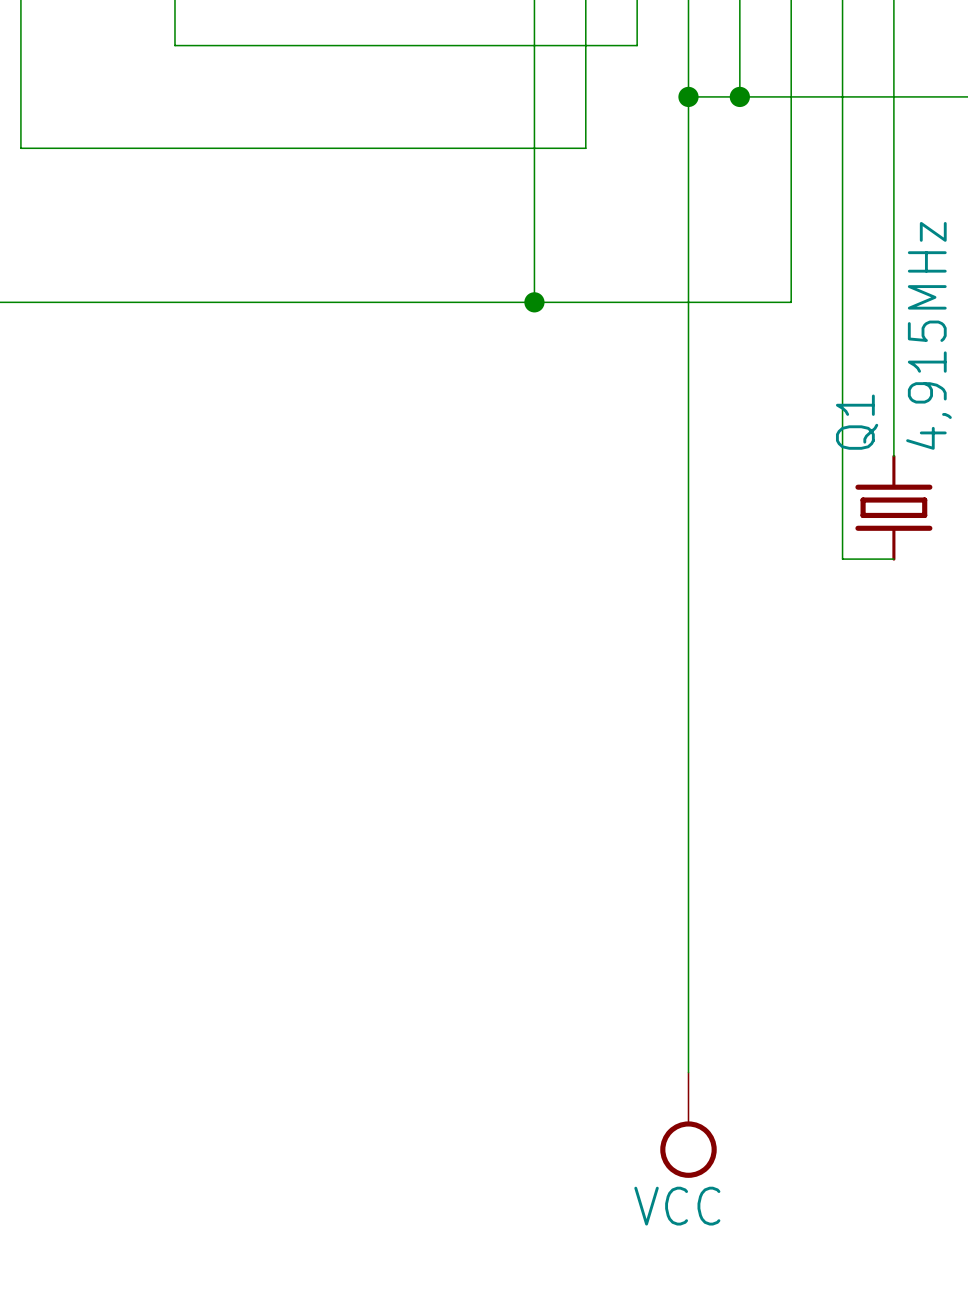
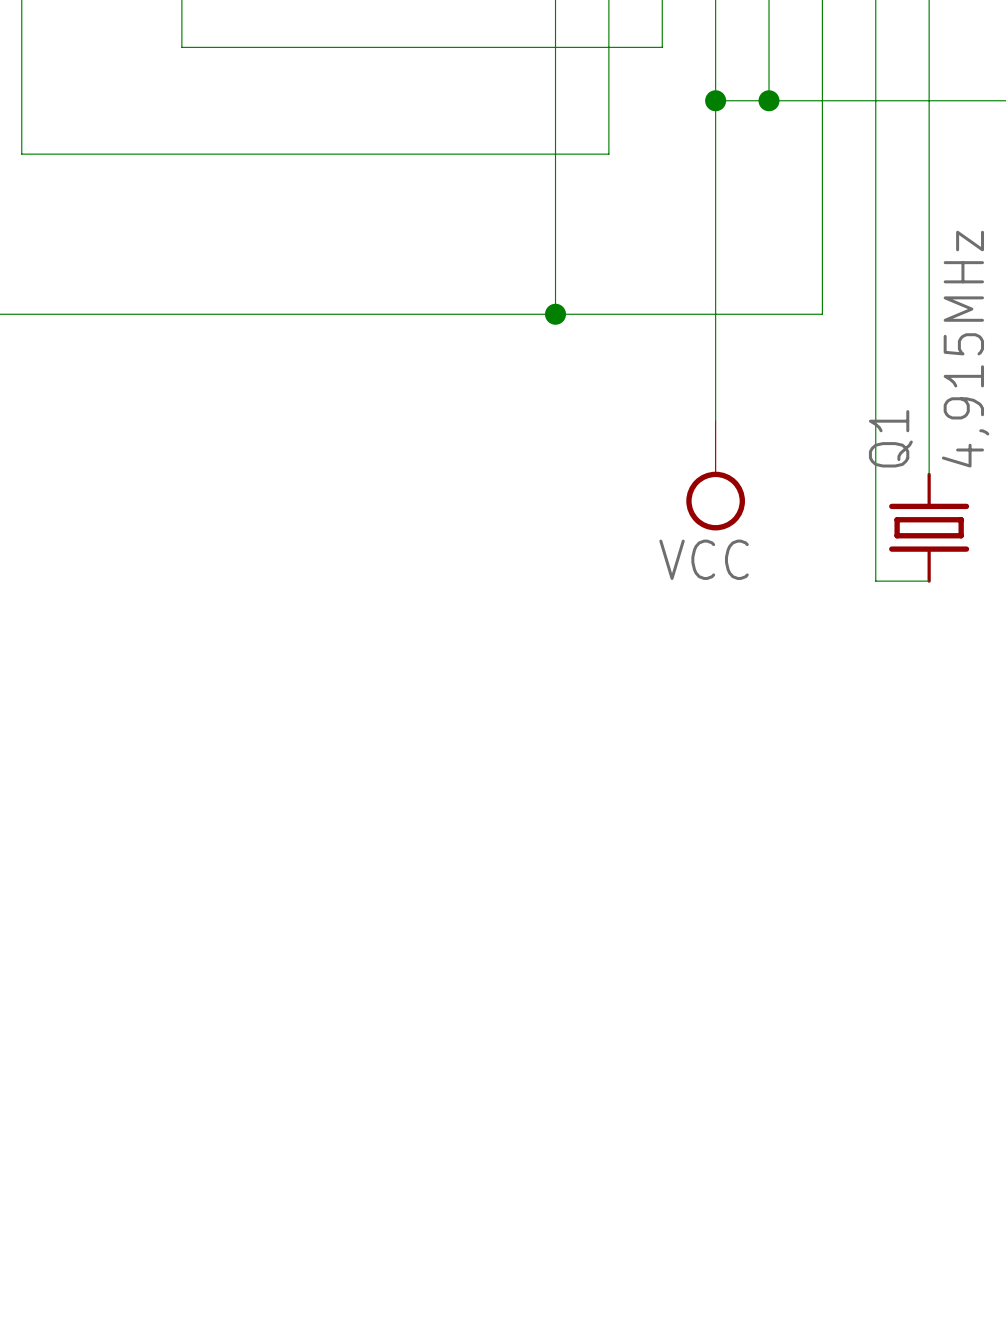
wire: (688, 405) (688, 1072) -> none
power symbol: none -> VCC (715, 475)
power symbol: VCC (688, 1125) -> none

